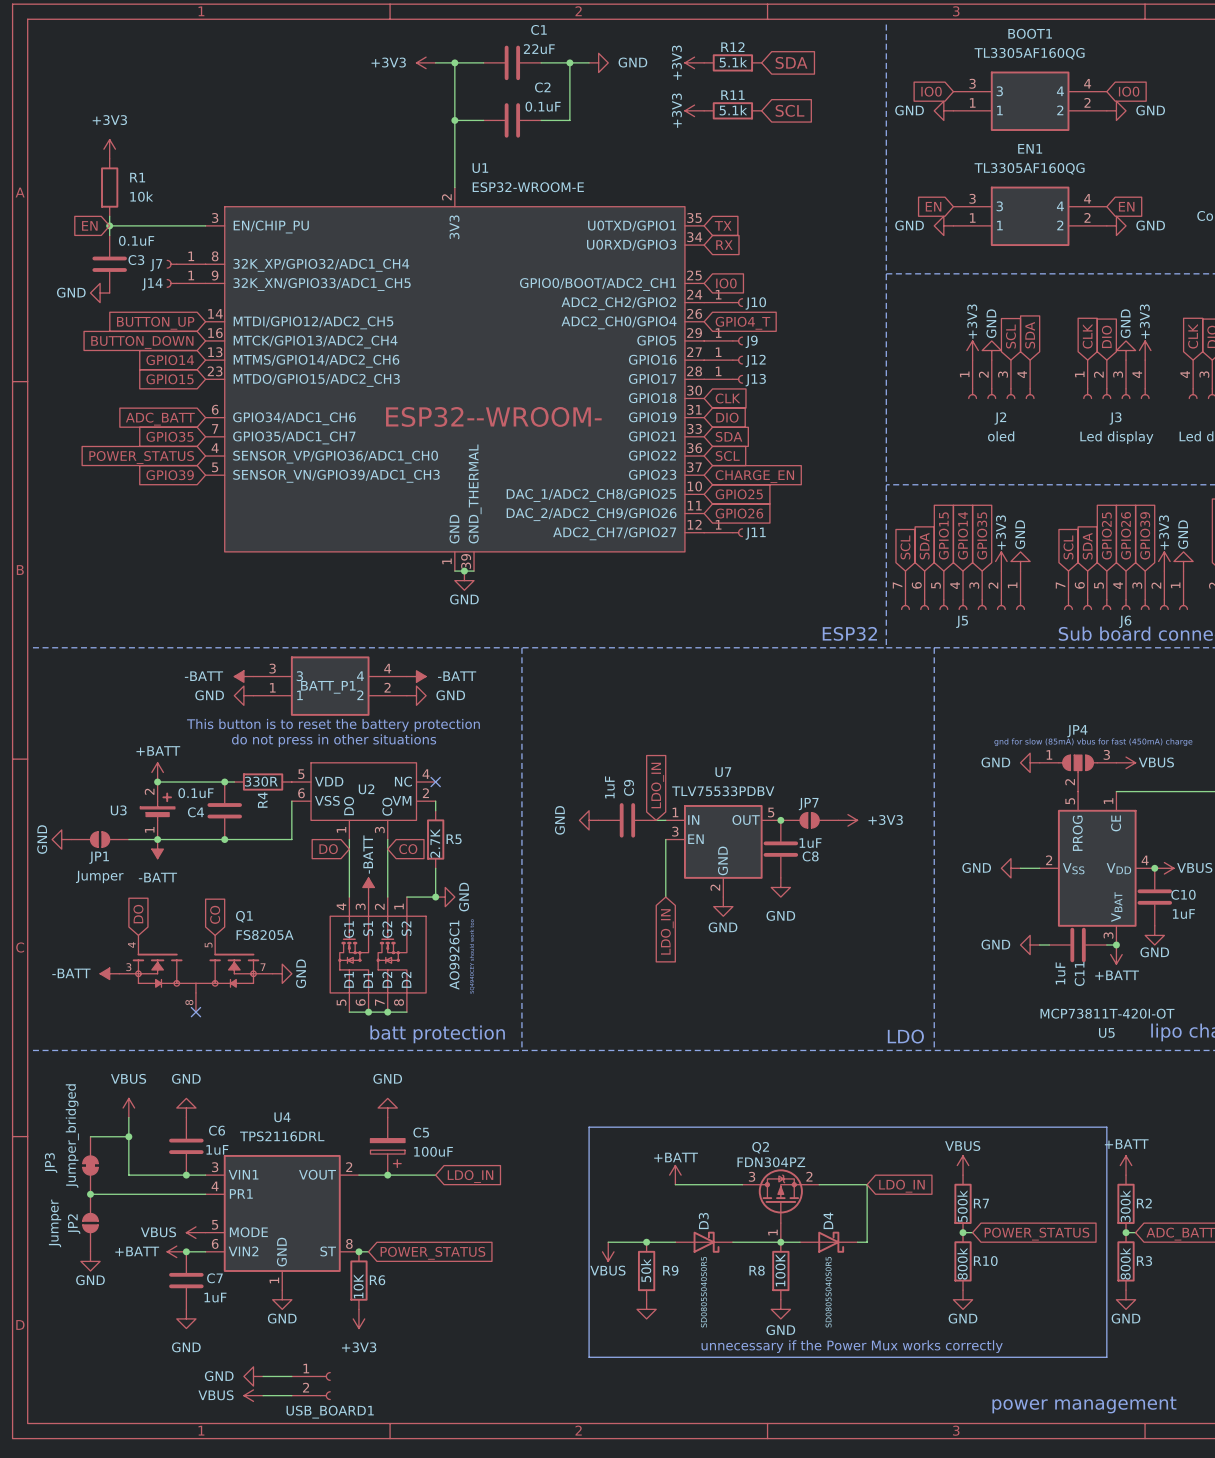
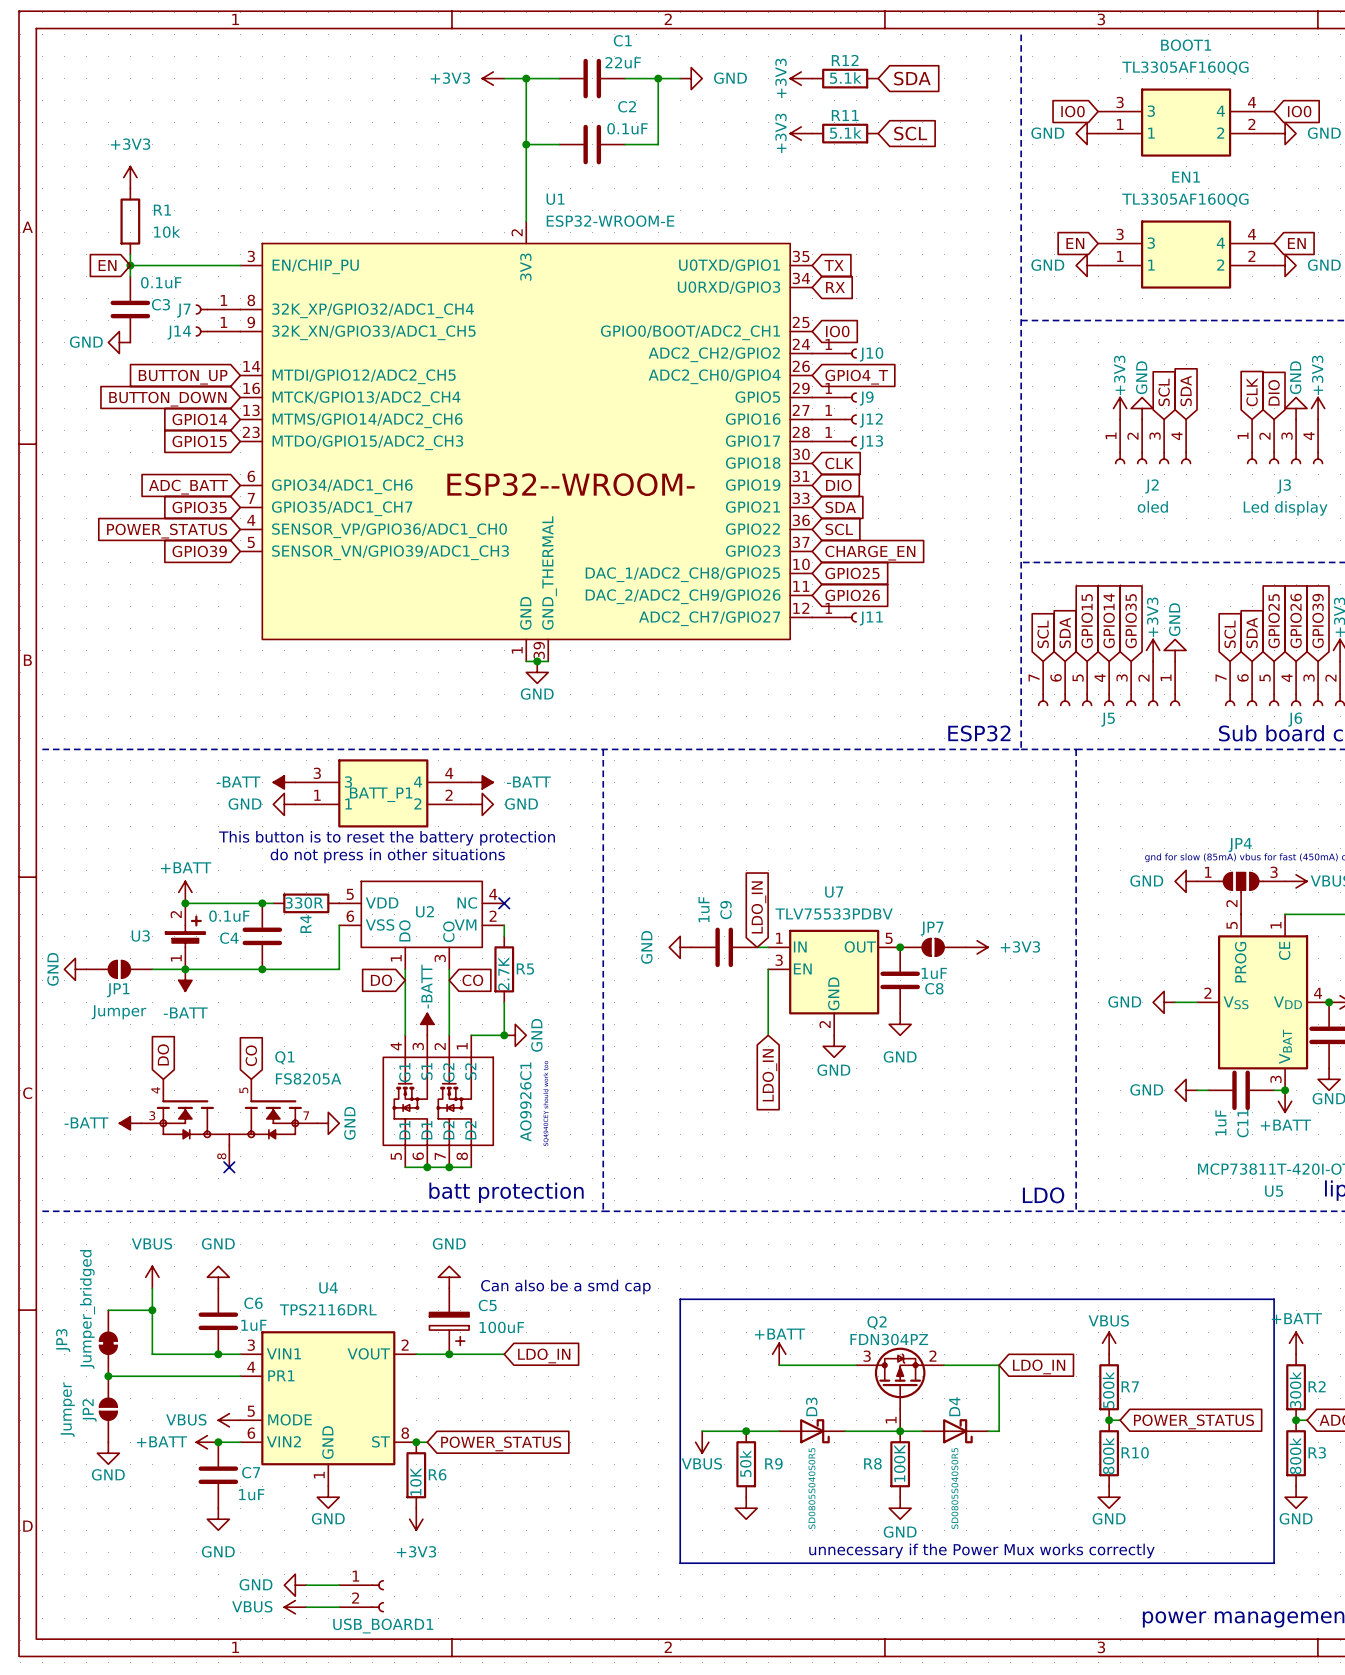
text: none -> Can also be a smd cap (565, 1287)

